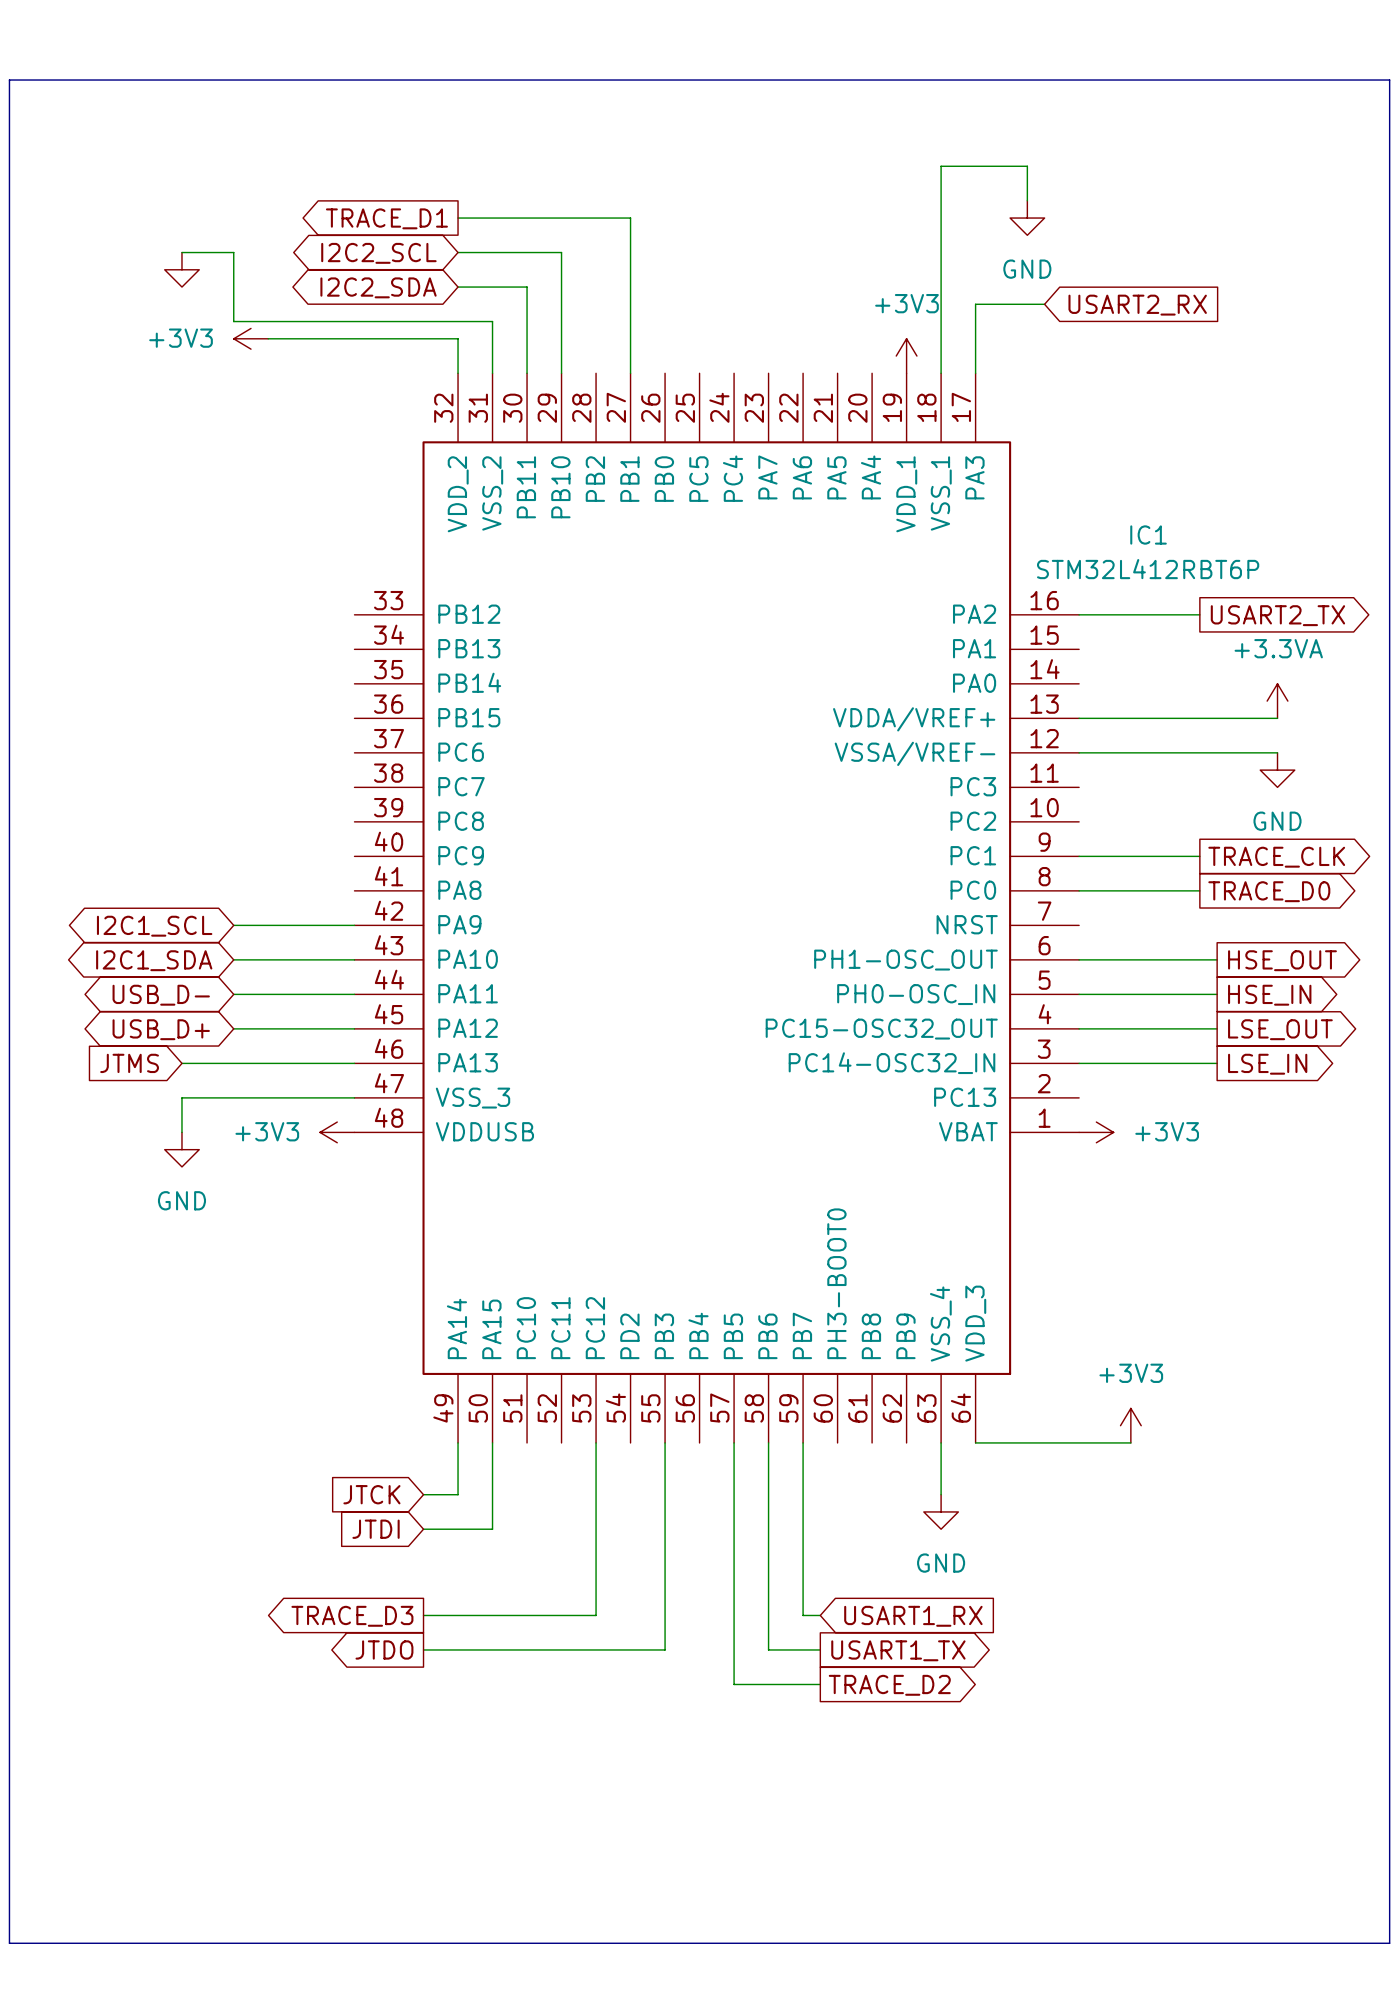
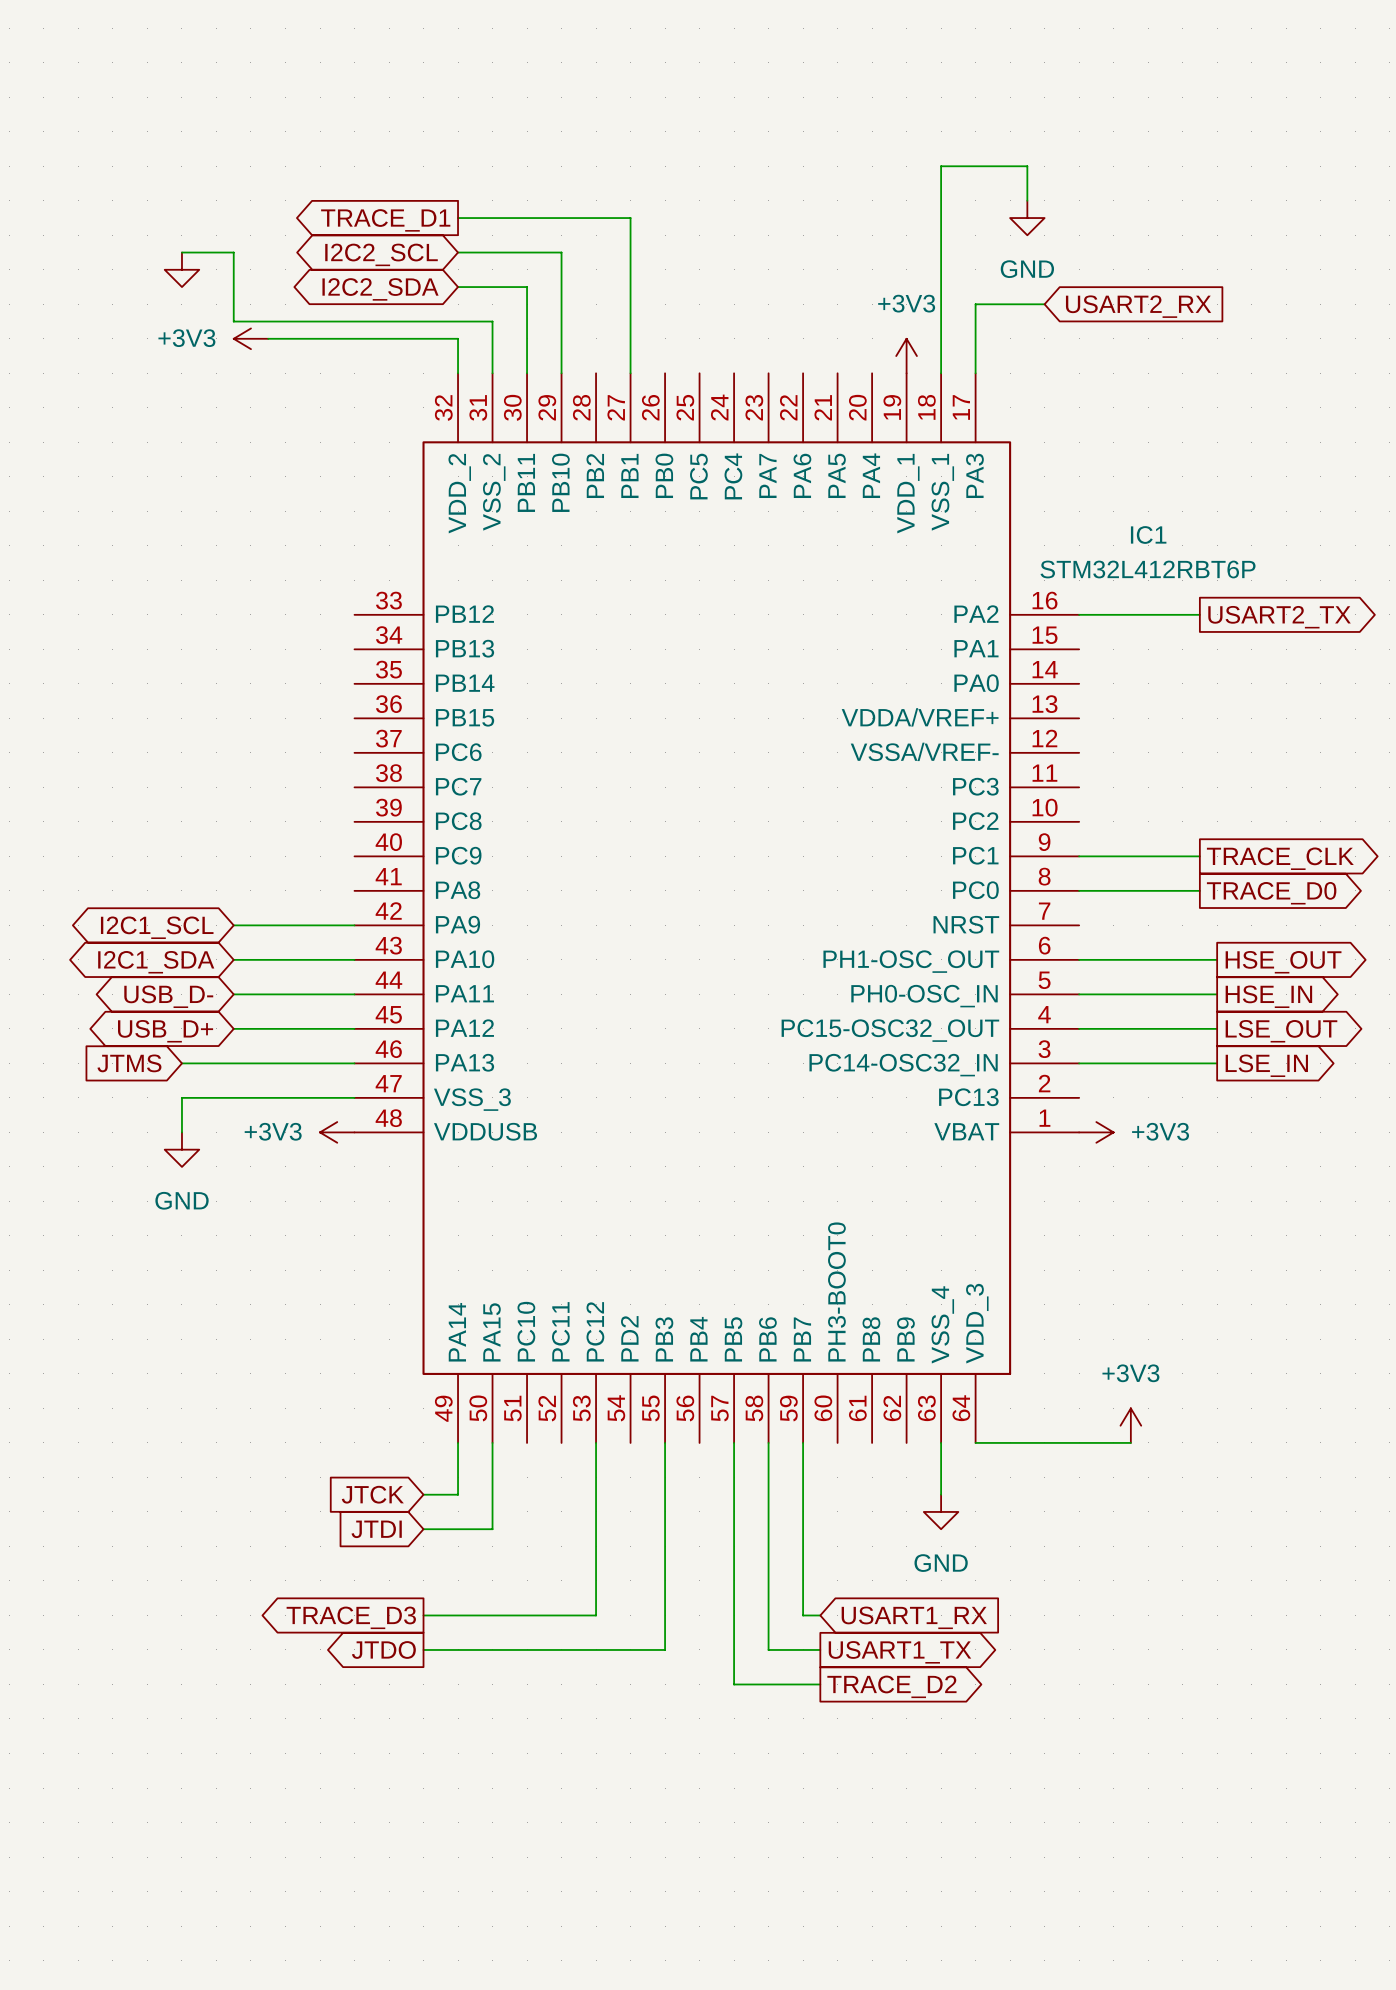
line: (9, 80) (1389, 80) (1389, 1943) (9, 1943) (9, 80) -> none
power symbol: +3.3VA (1277, 701) -> none
wire: (1079, 718) (1277, 718) -> none
wire: (1079, 752) (1277, 752) -> none
power symbol: GND (1277, 770) -> none

